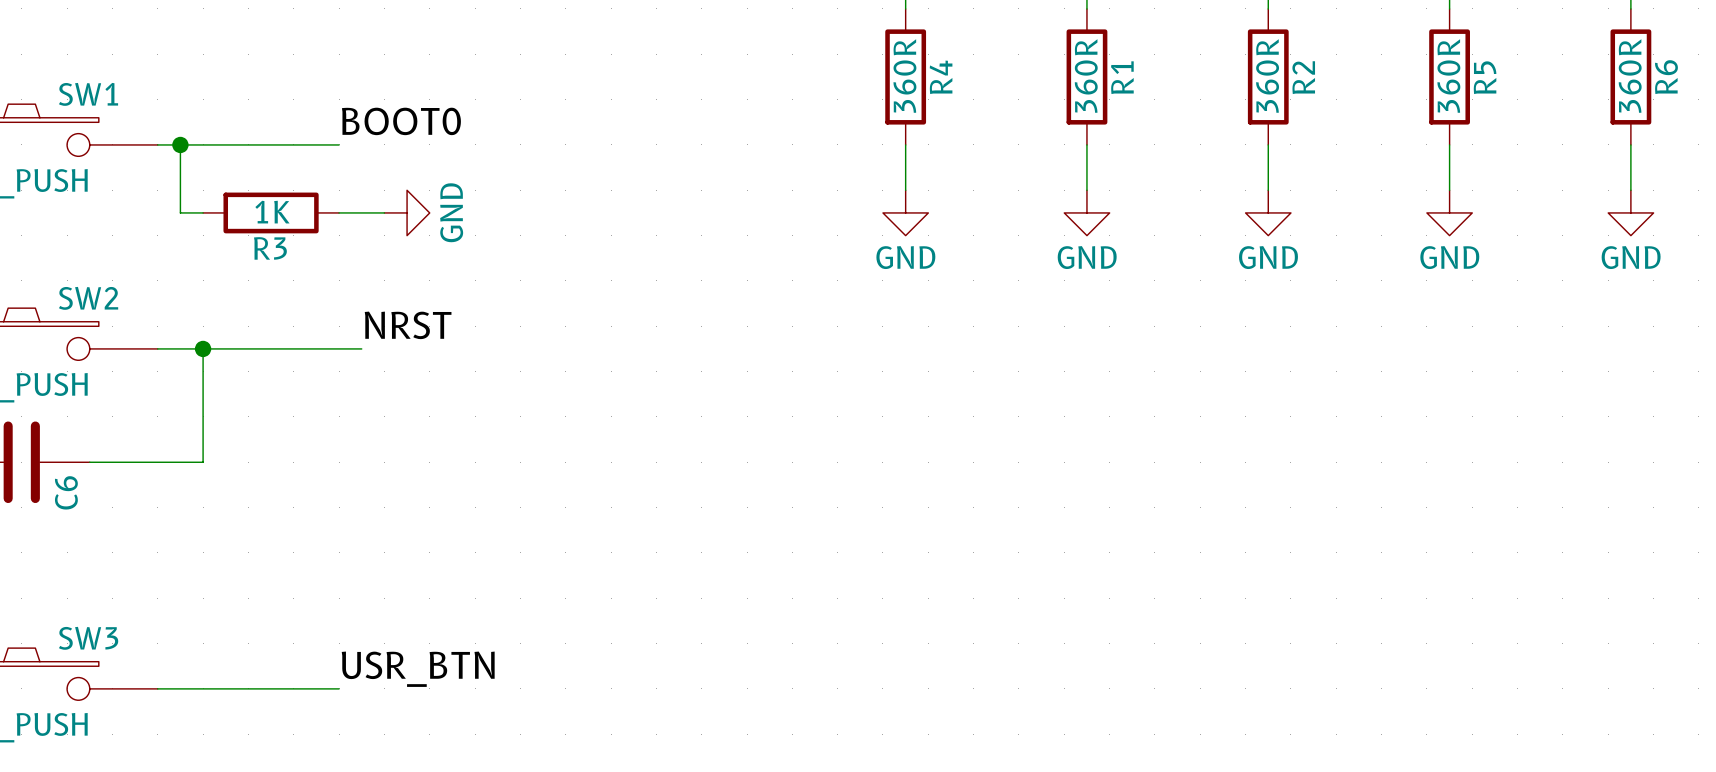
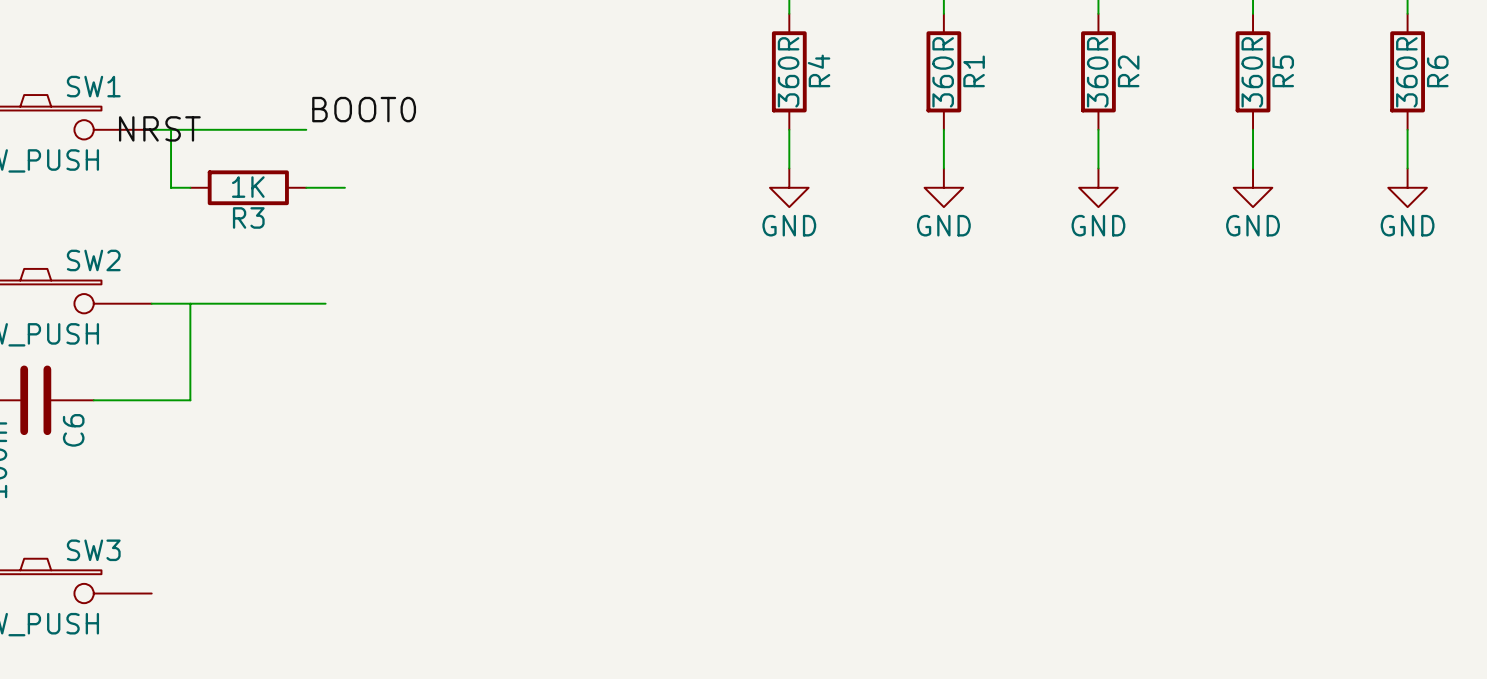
junction: (180, 144) -> none
power symbol: GND (407, 212) -> none
label position: NRST (408, 325) -> NRST (159, 128)
junction: (203, 348) -> none
label: USR_BTN (418, 669) -> none
wire: (157, 688) (339, 688) -> none

